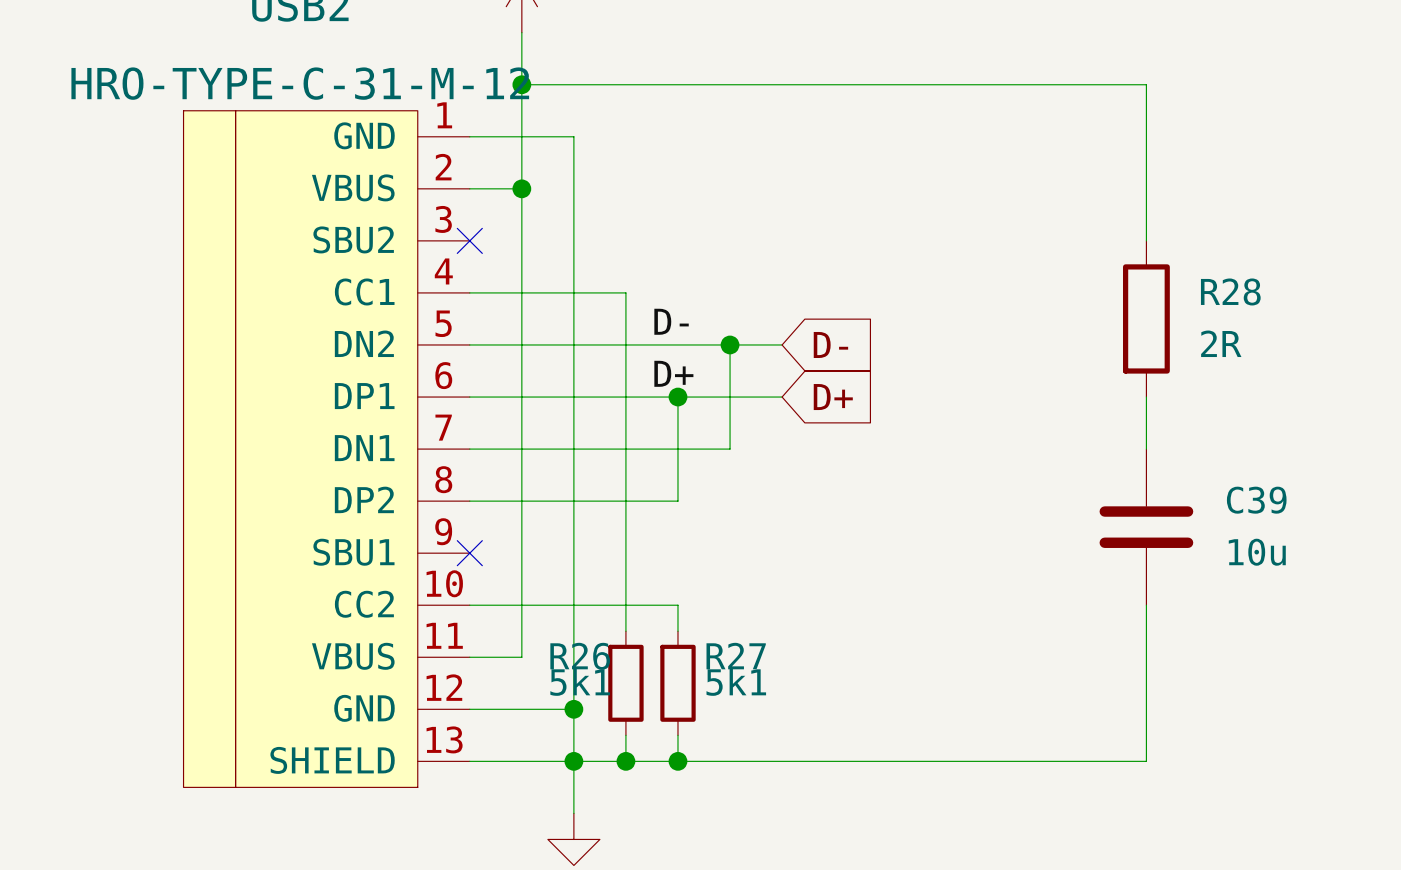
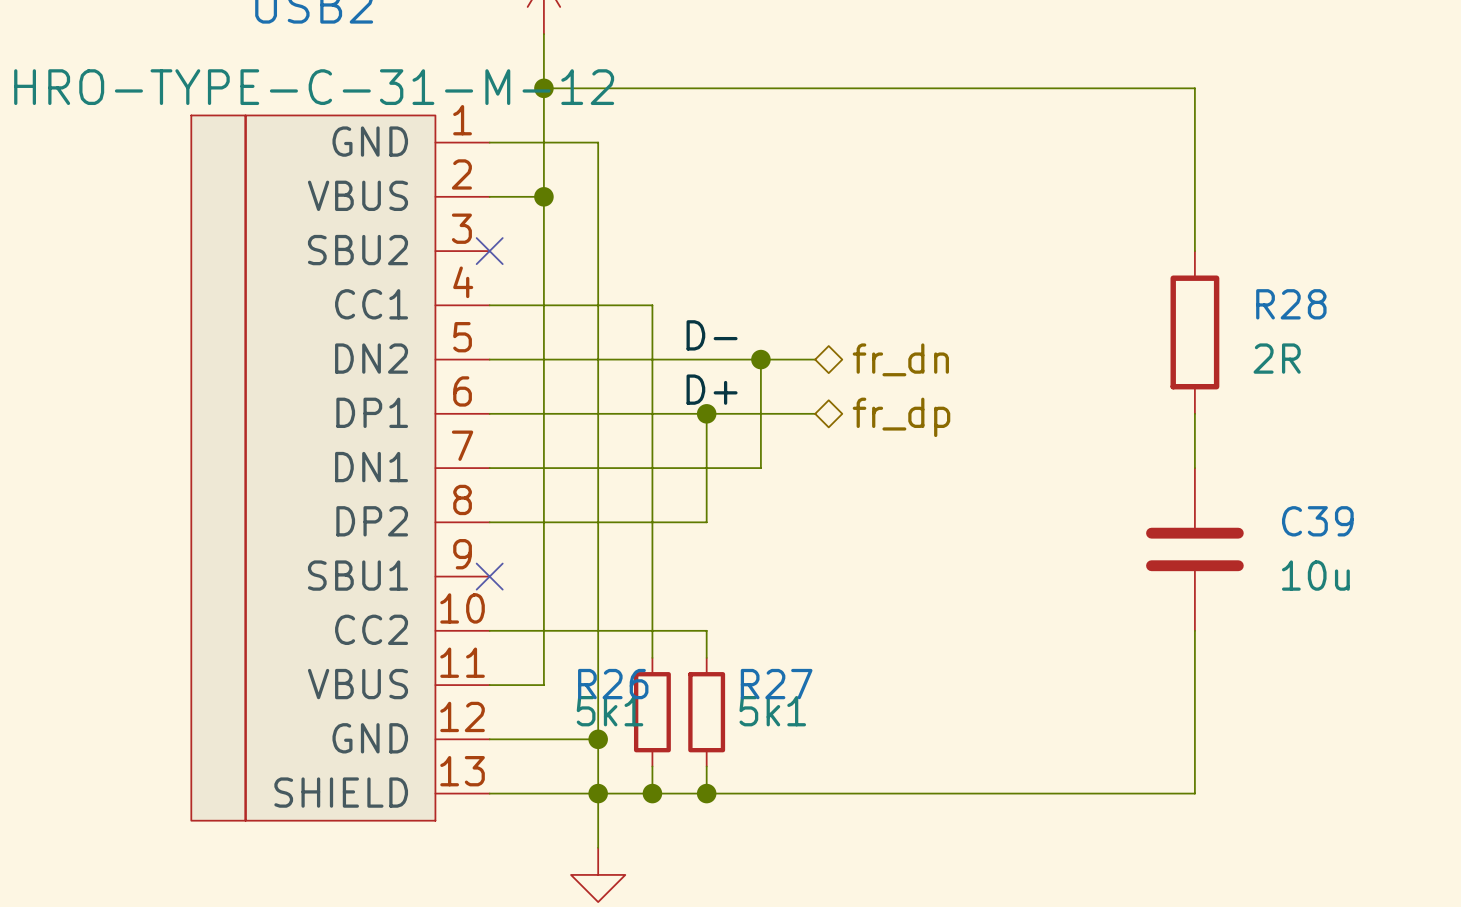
global label: D- (830, 344) -> none
hierarchical label: none -> fr_dn (900, 359)
global label: D+ (833, 397) -> none
hierarchical label: none -> fr_dp (901, 417)

